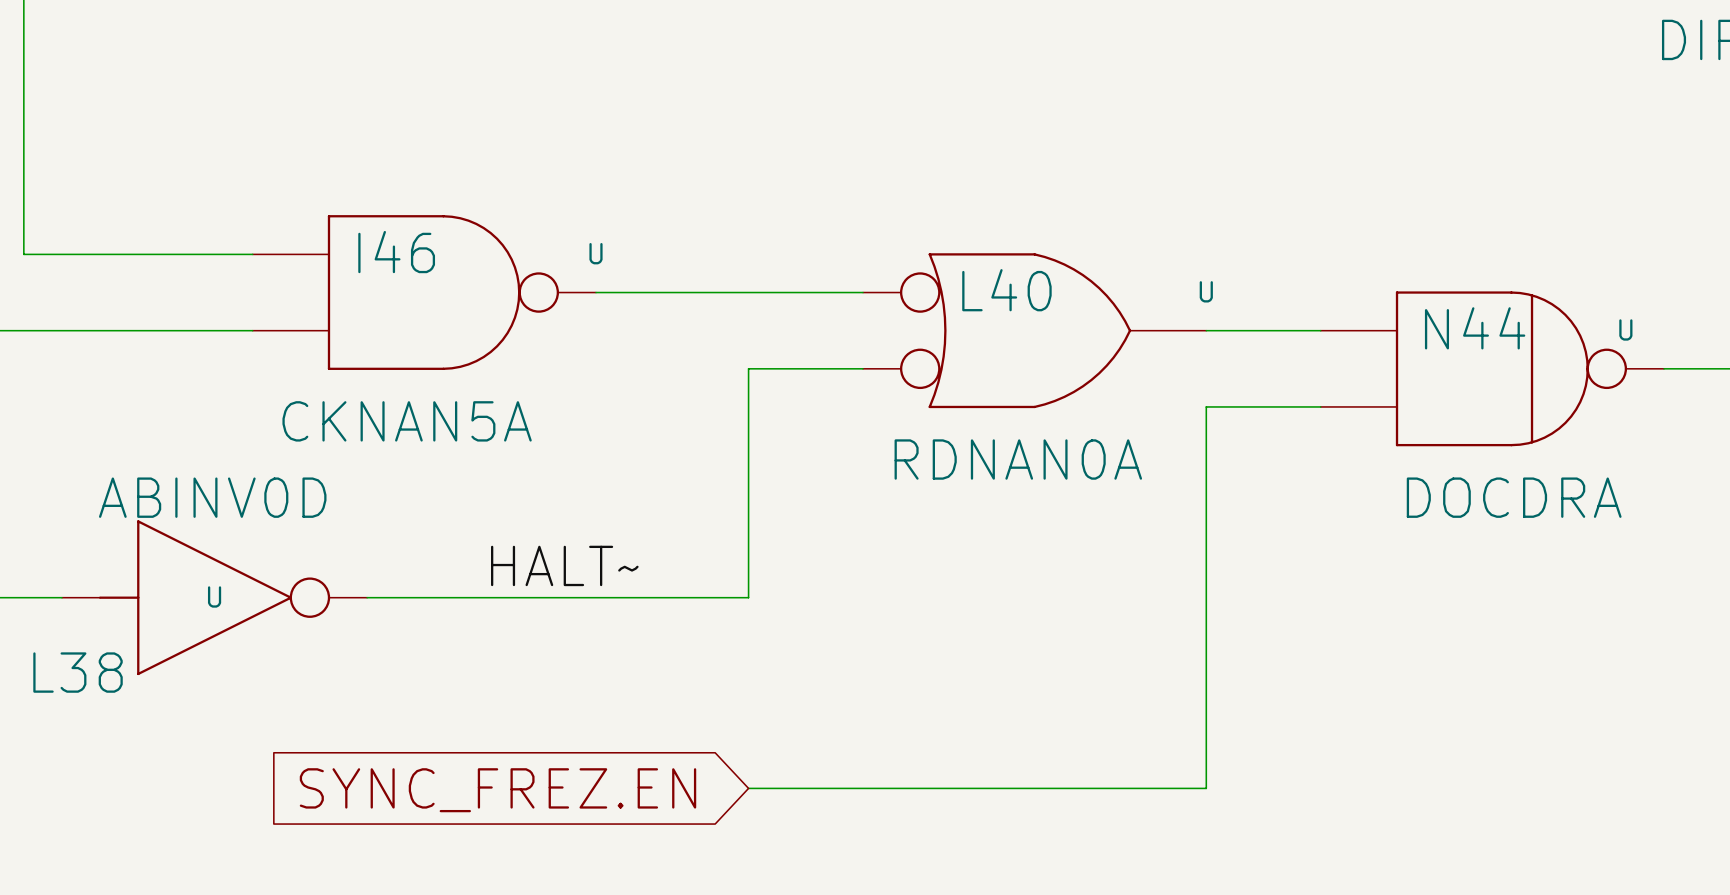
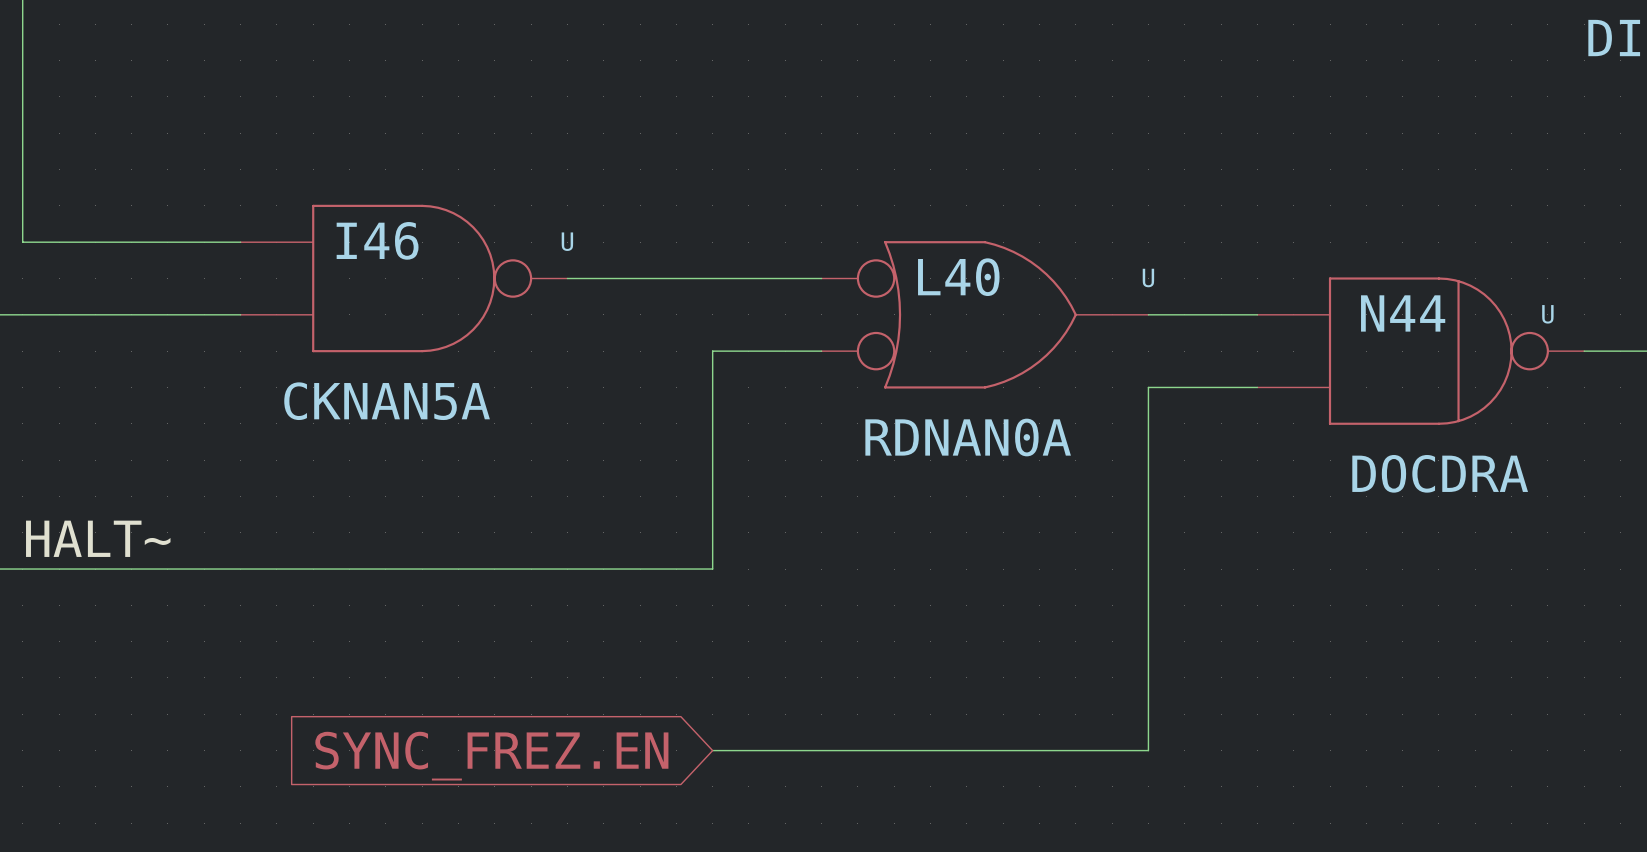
label: none -> HALT~ (98, 538)
label: HALT~ (564, 565) -> none
wire: none -> (59, 569) (349, 569)
U: (214, 597) -> none

